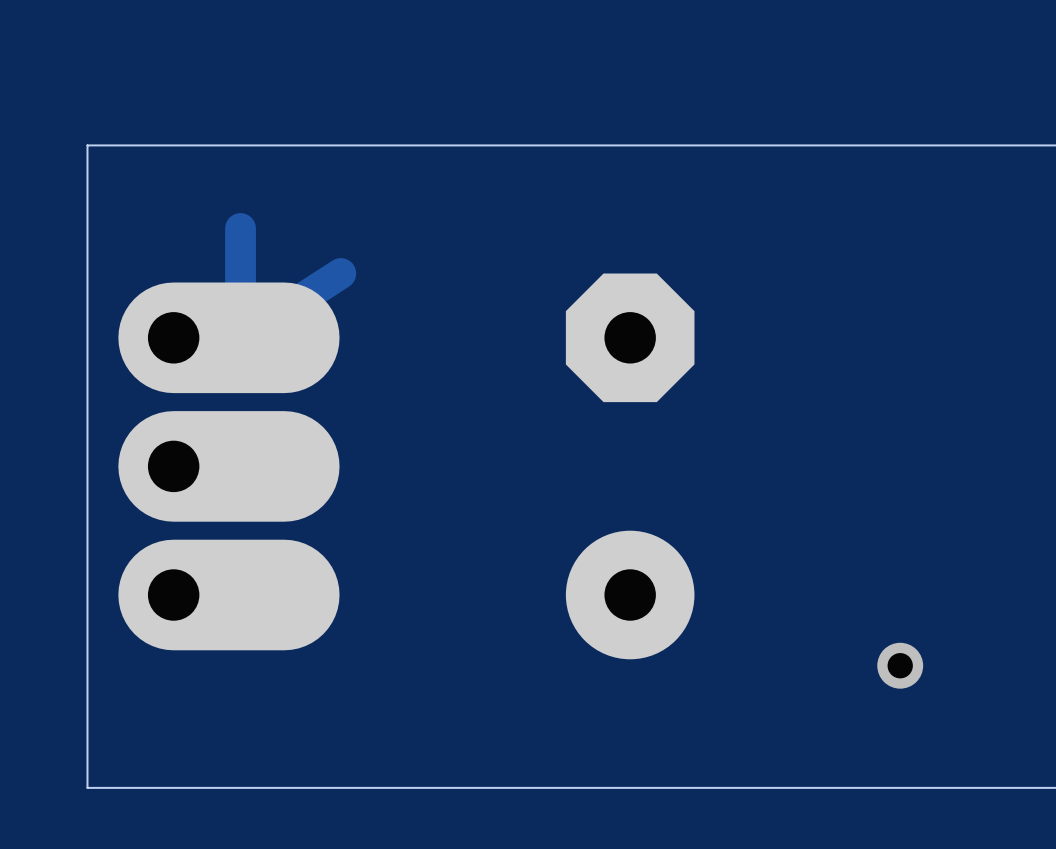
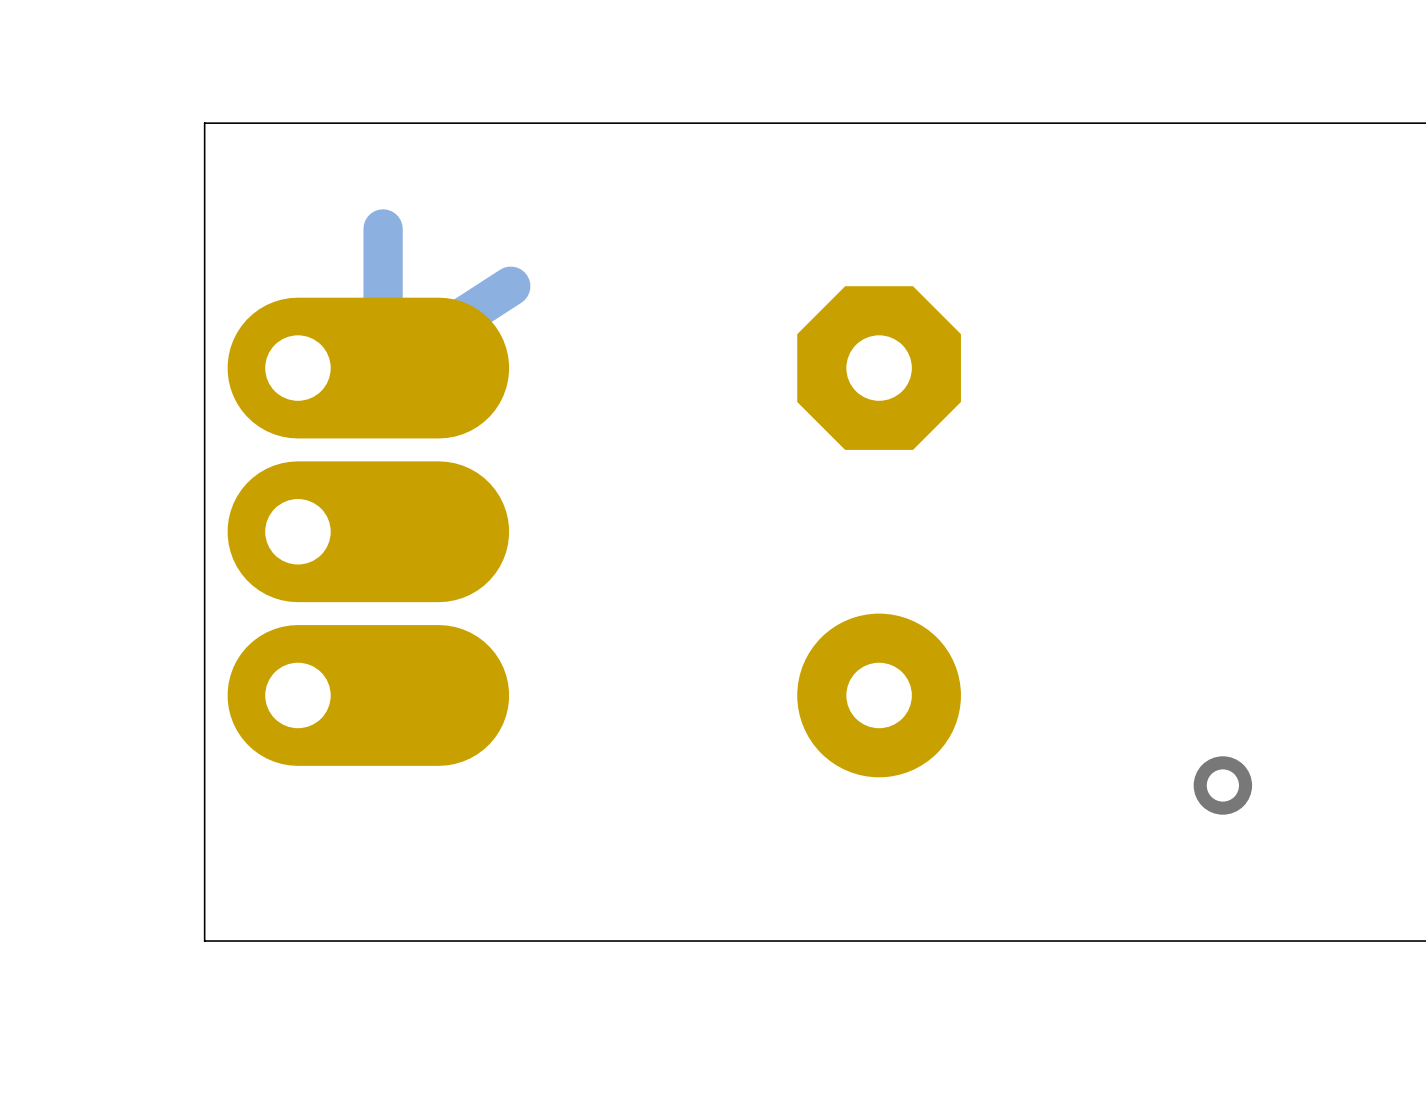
board edge: (100, 145) (87, 145) (87, 787) (100, 787) -> (204, 123) (204, 941)

